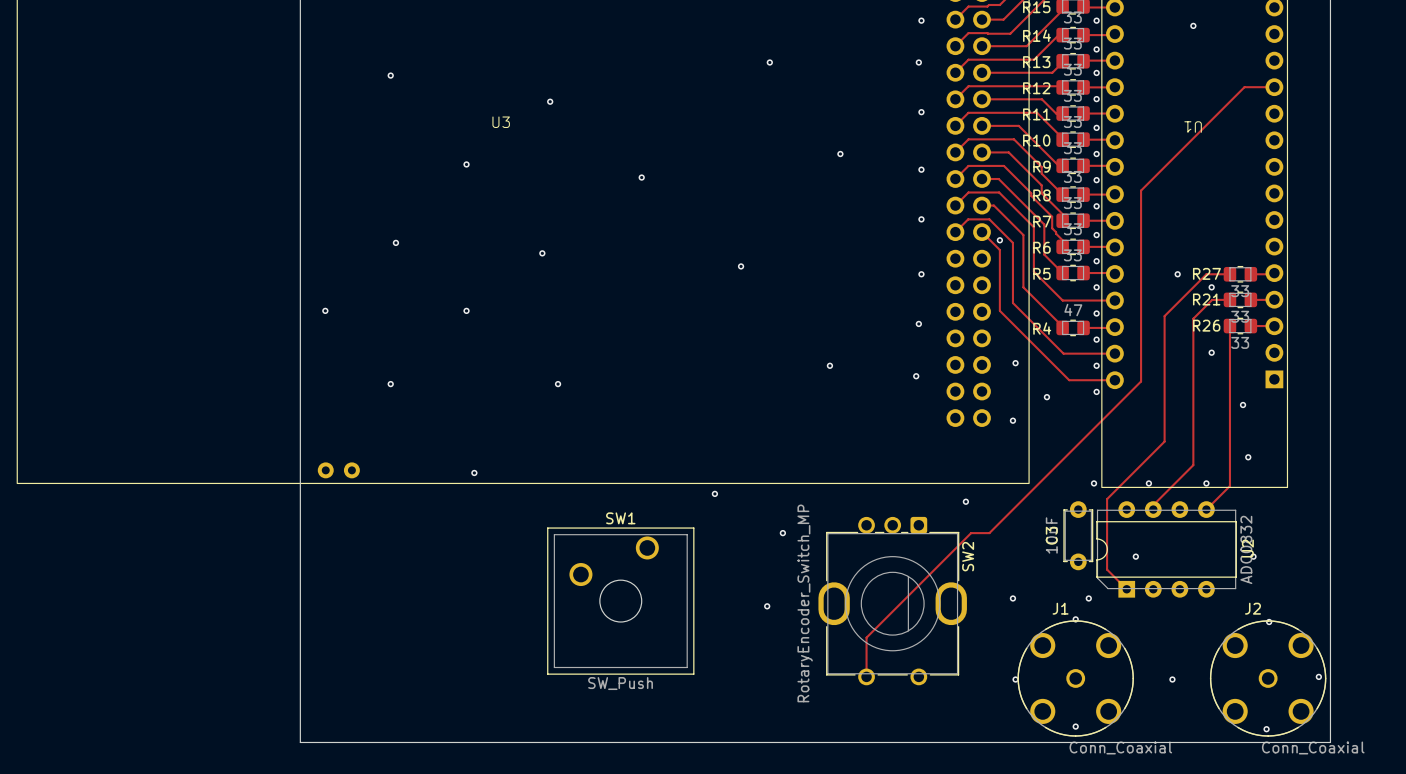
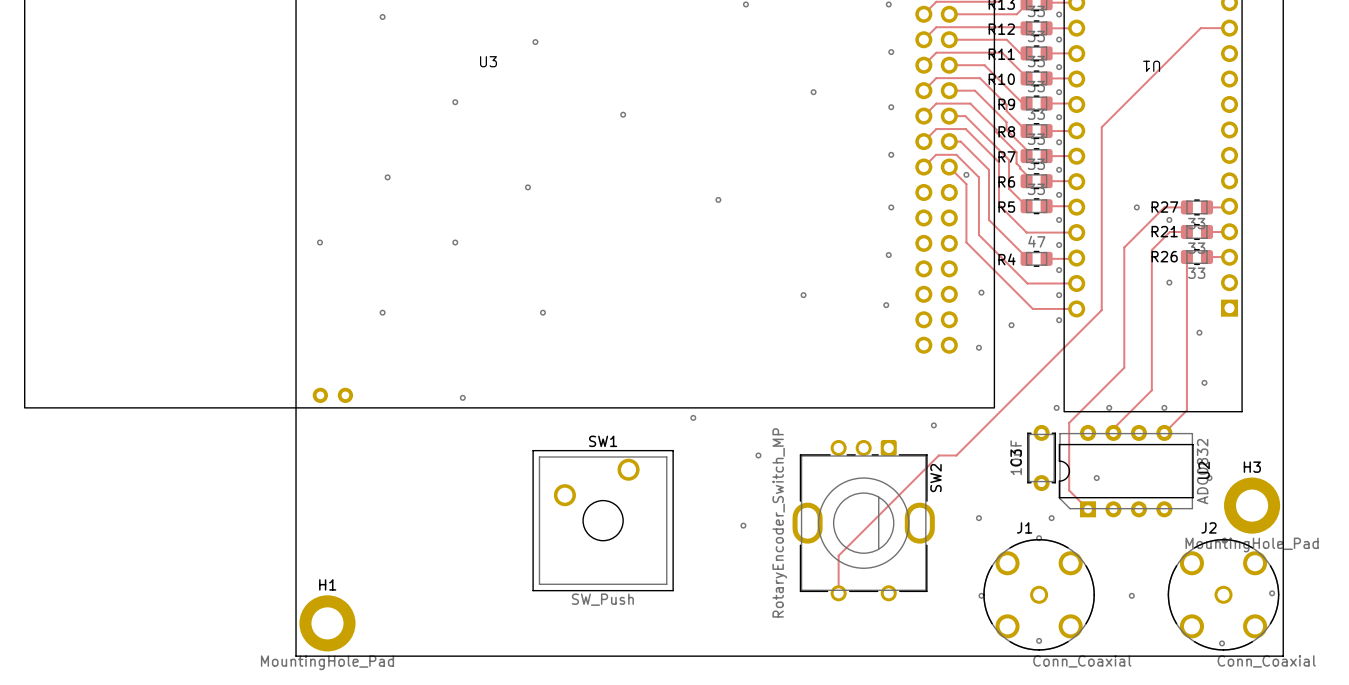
H3: none -> MountingHole_Pad (1252, 505)
H1: none -> MountingHole_Pad (327, 623)

